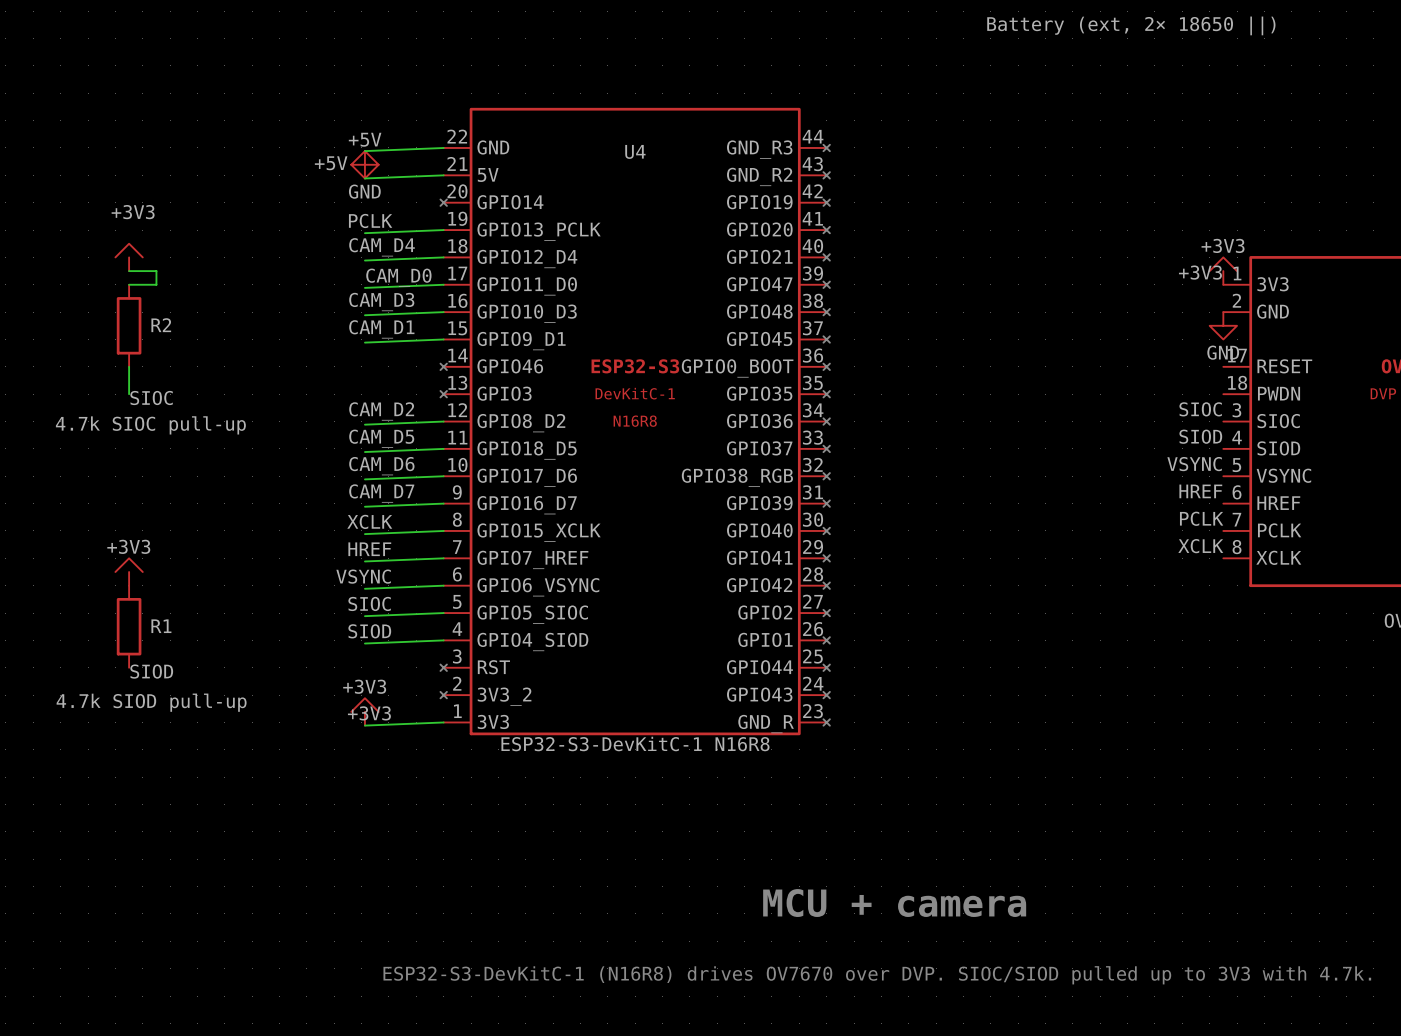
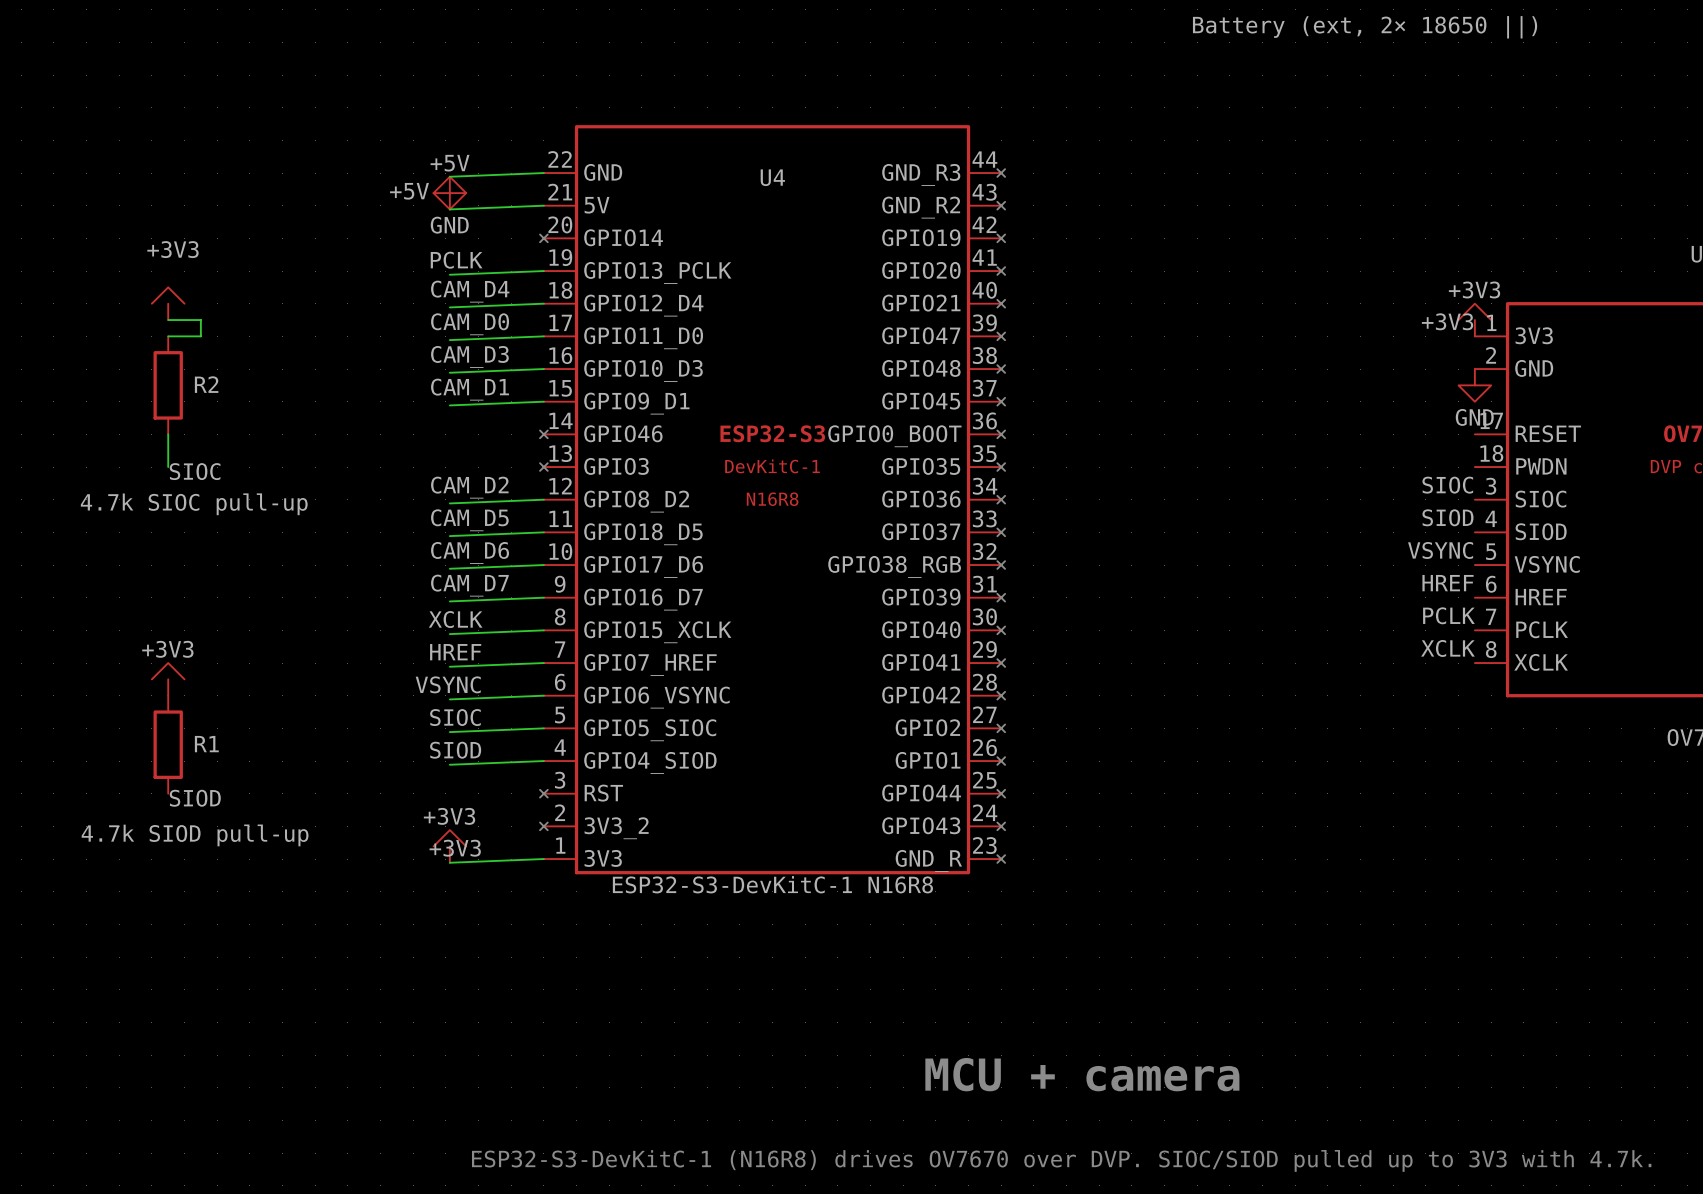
label position: CAM_D0 (398, 277) -> CAM_D0 (470, 324)

